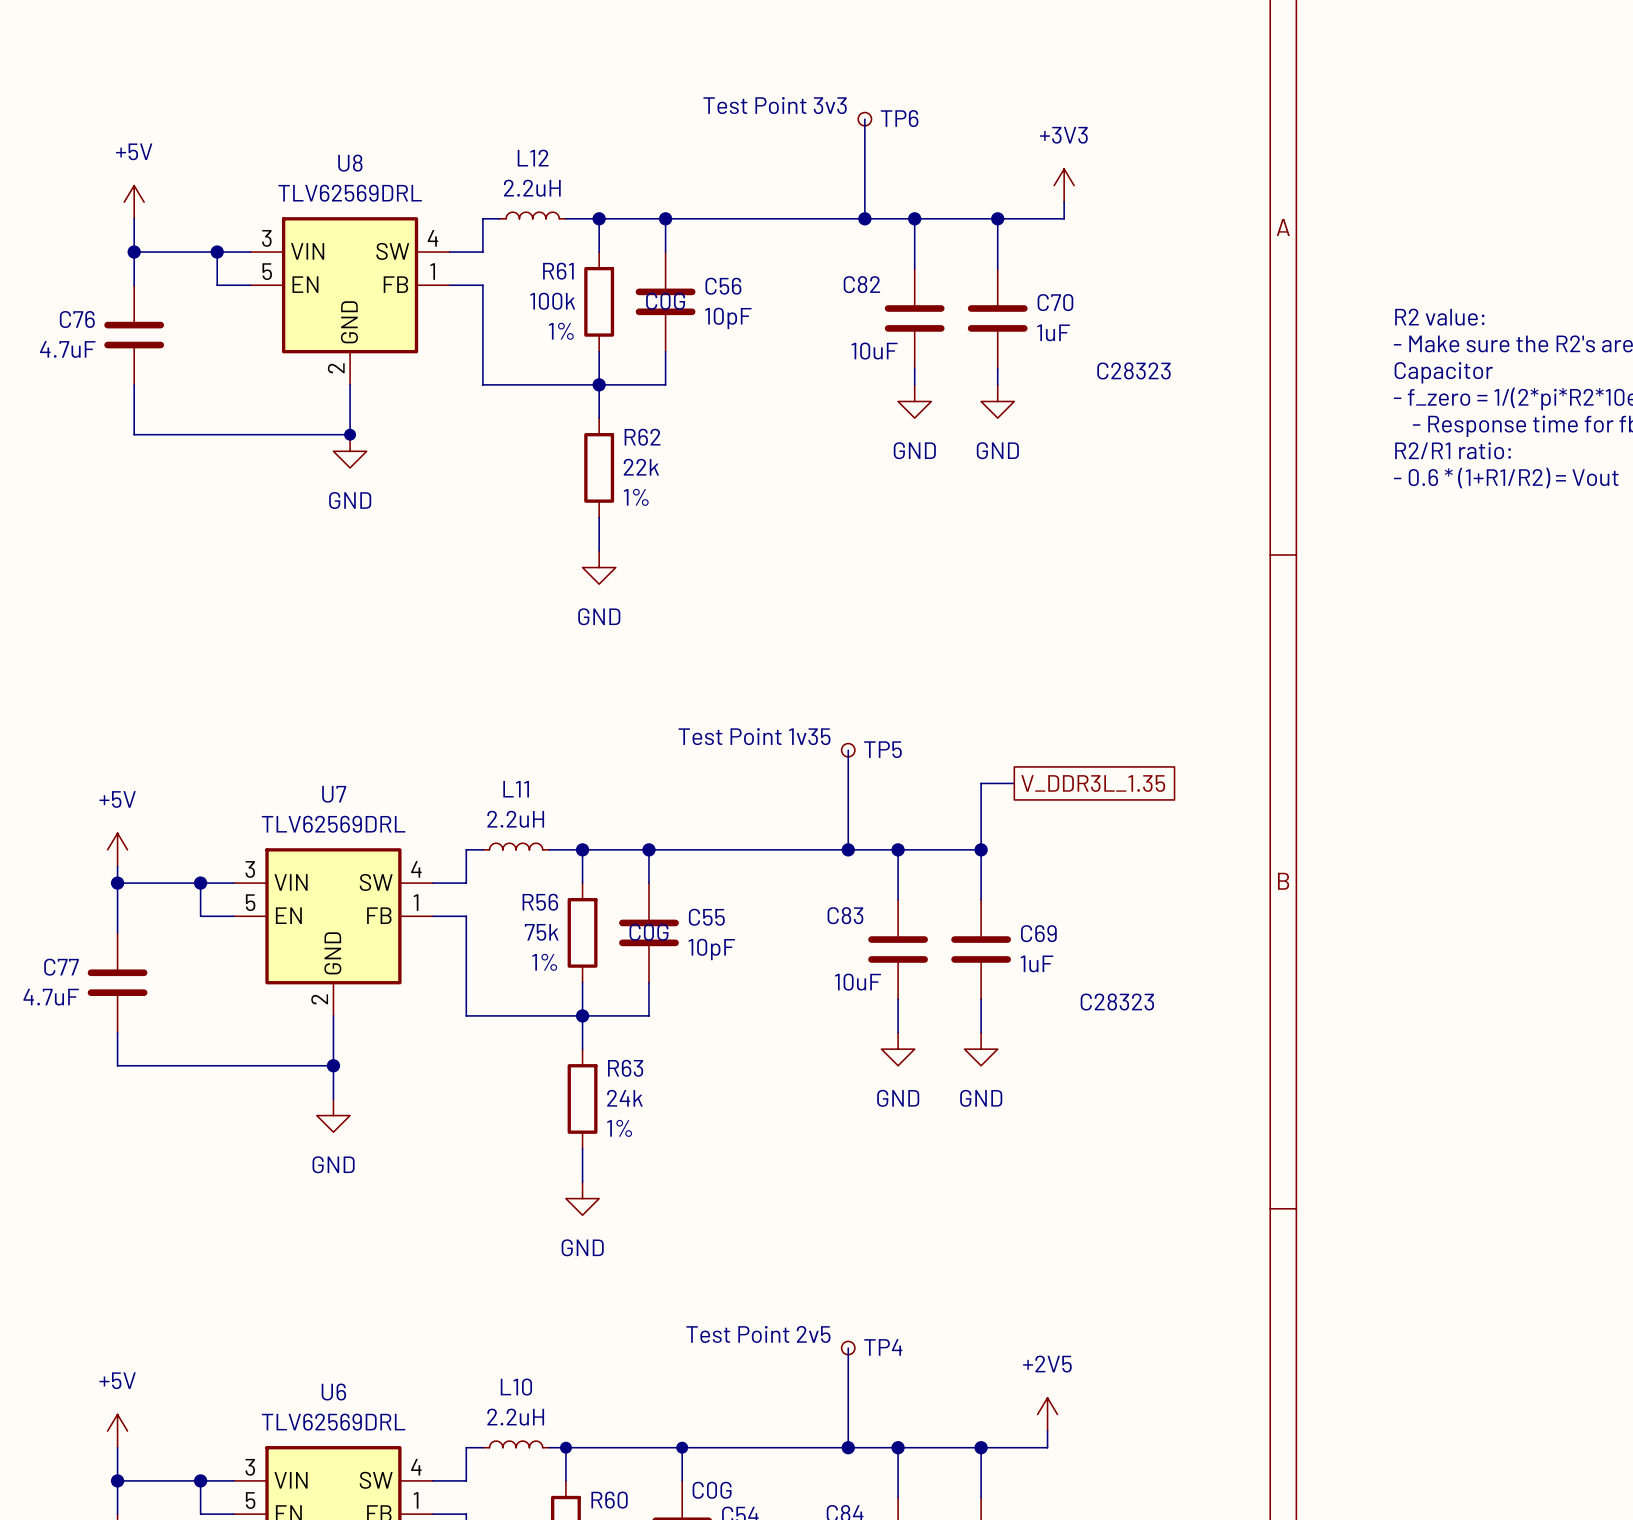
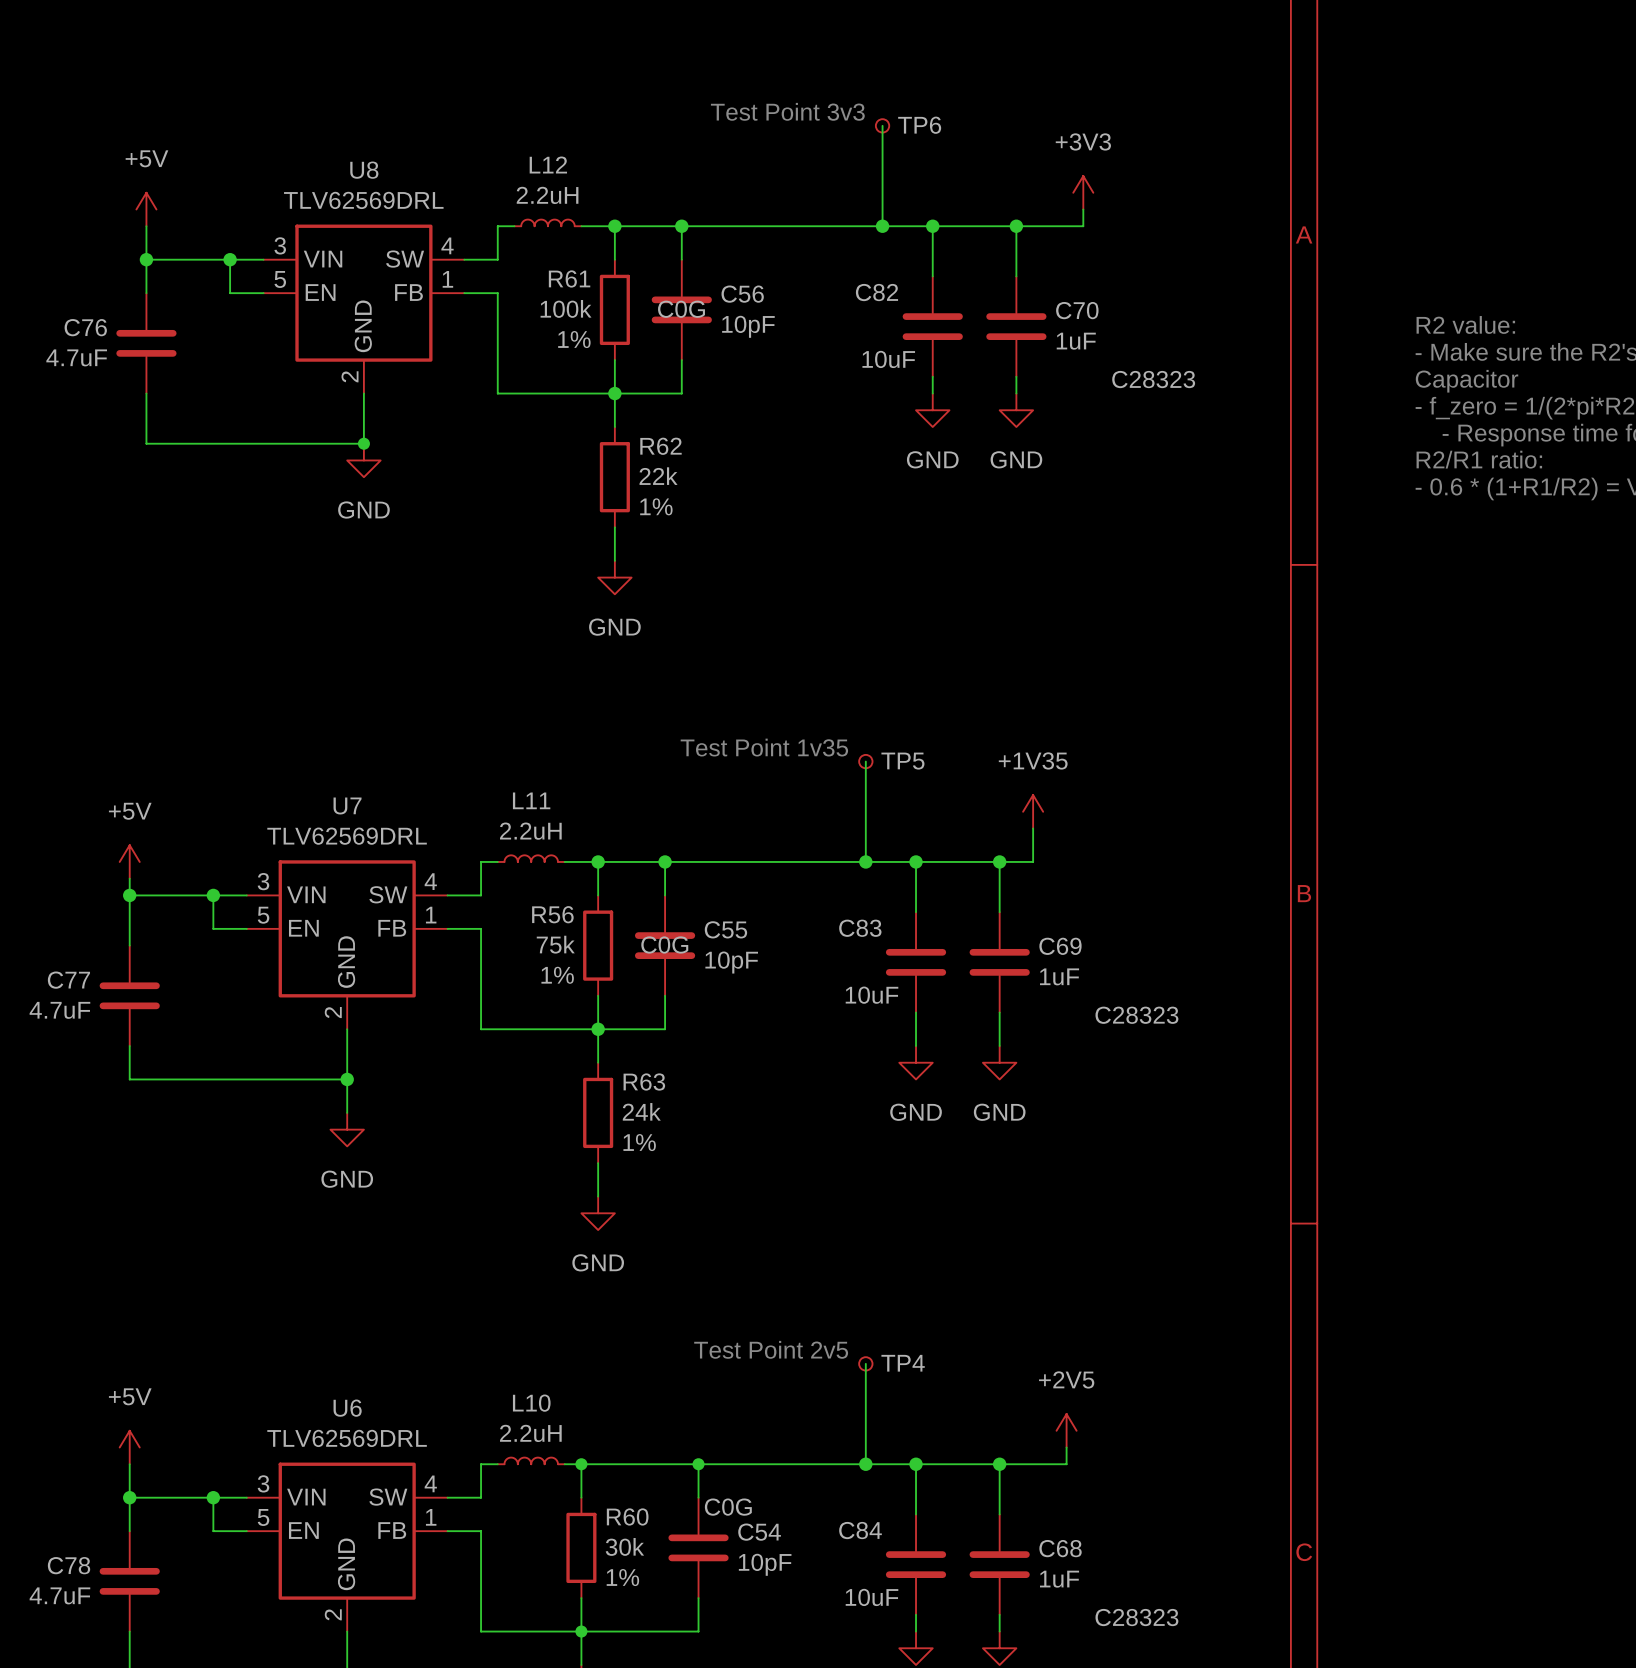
wire: (1014, 783) (981, 783) (981, 849) -> (1033, 828) (1033, 861) (999, 861)
global label: V_DDR3L_1.35 (1093, 783) -> none
power symbol: none -> +1V35 (1033, 811)

